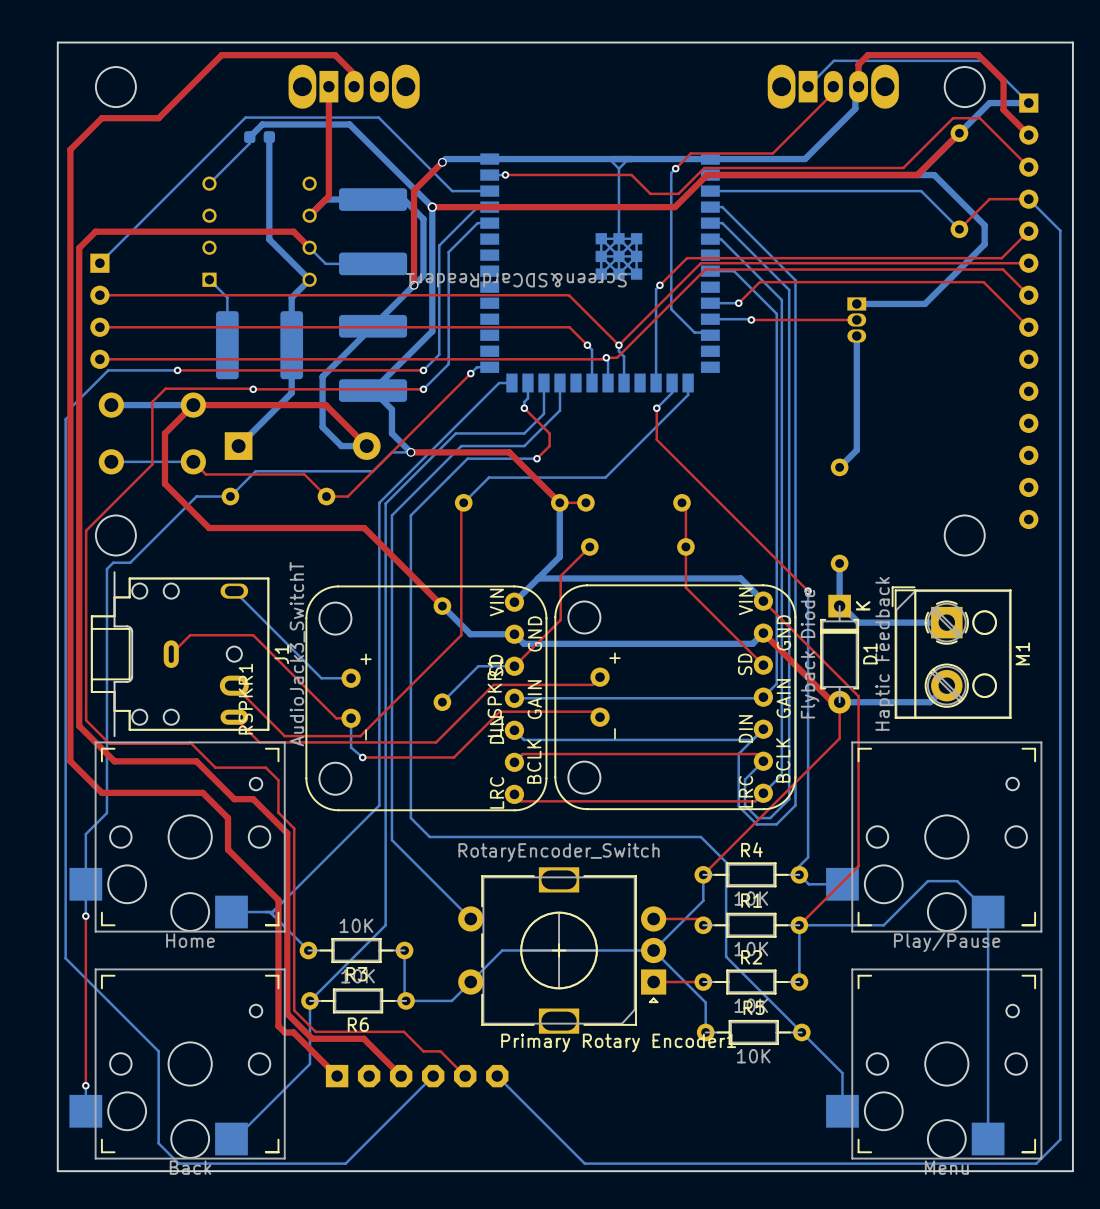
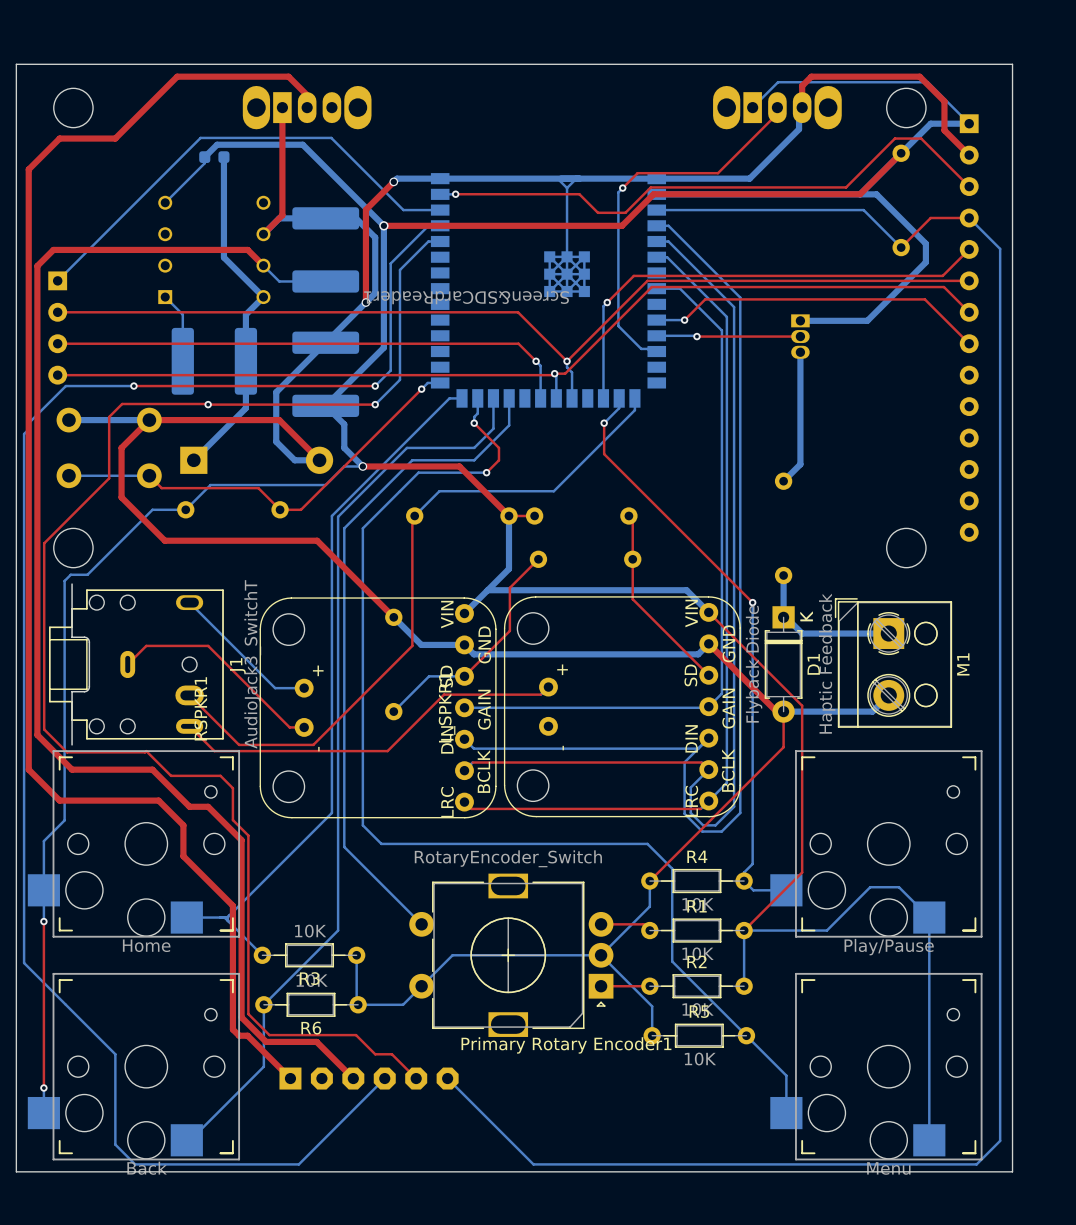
top track: (600, 717) (594, 711) (499, 711) (453, 757) (362, 757) -> none
bottom track: (351, 718) (351, 747) (362, 757) (361, 757) -> none
via: (362, 757) -> none

